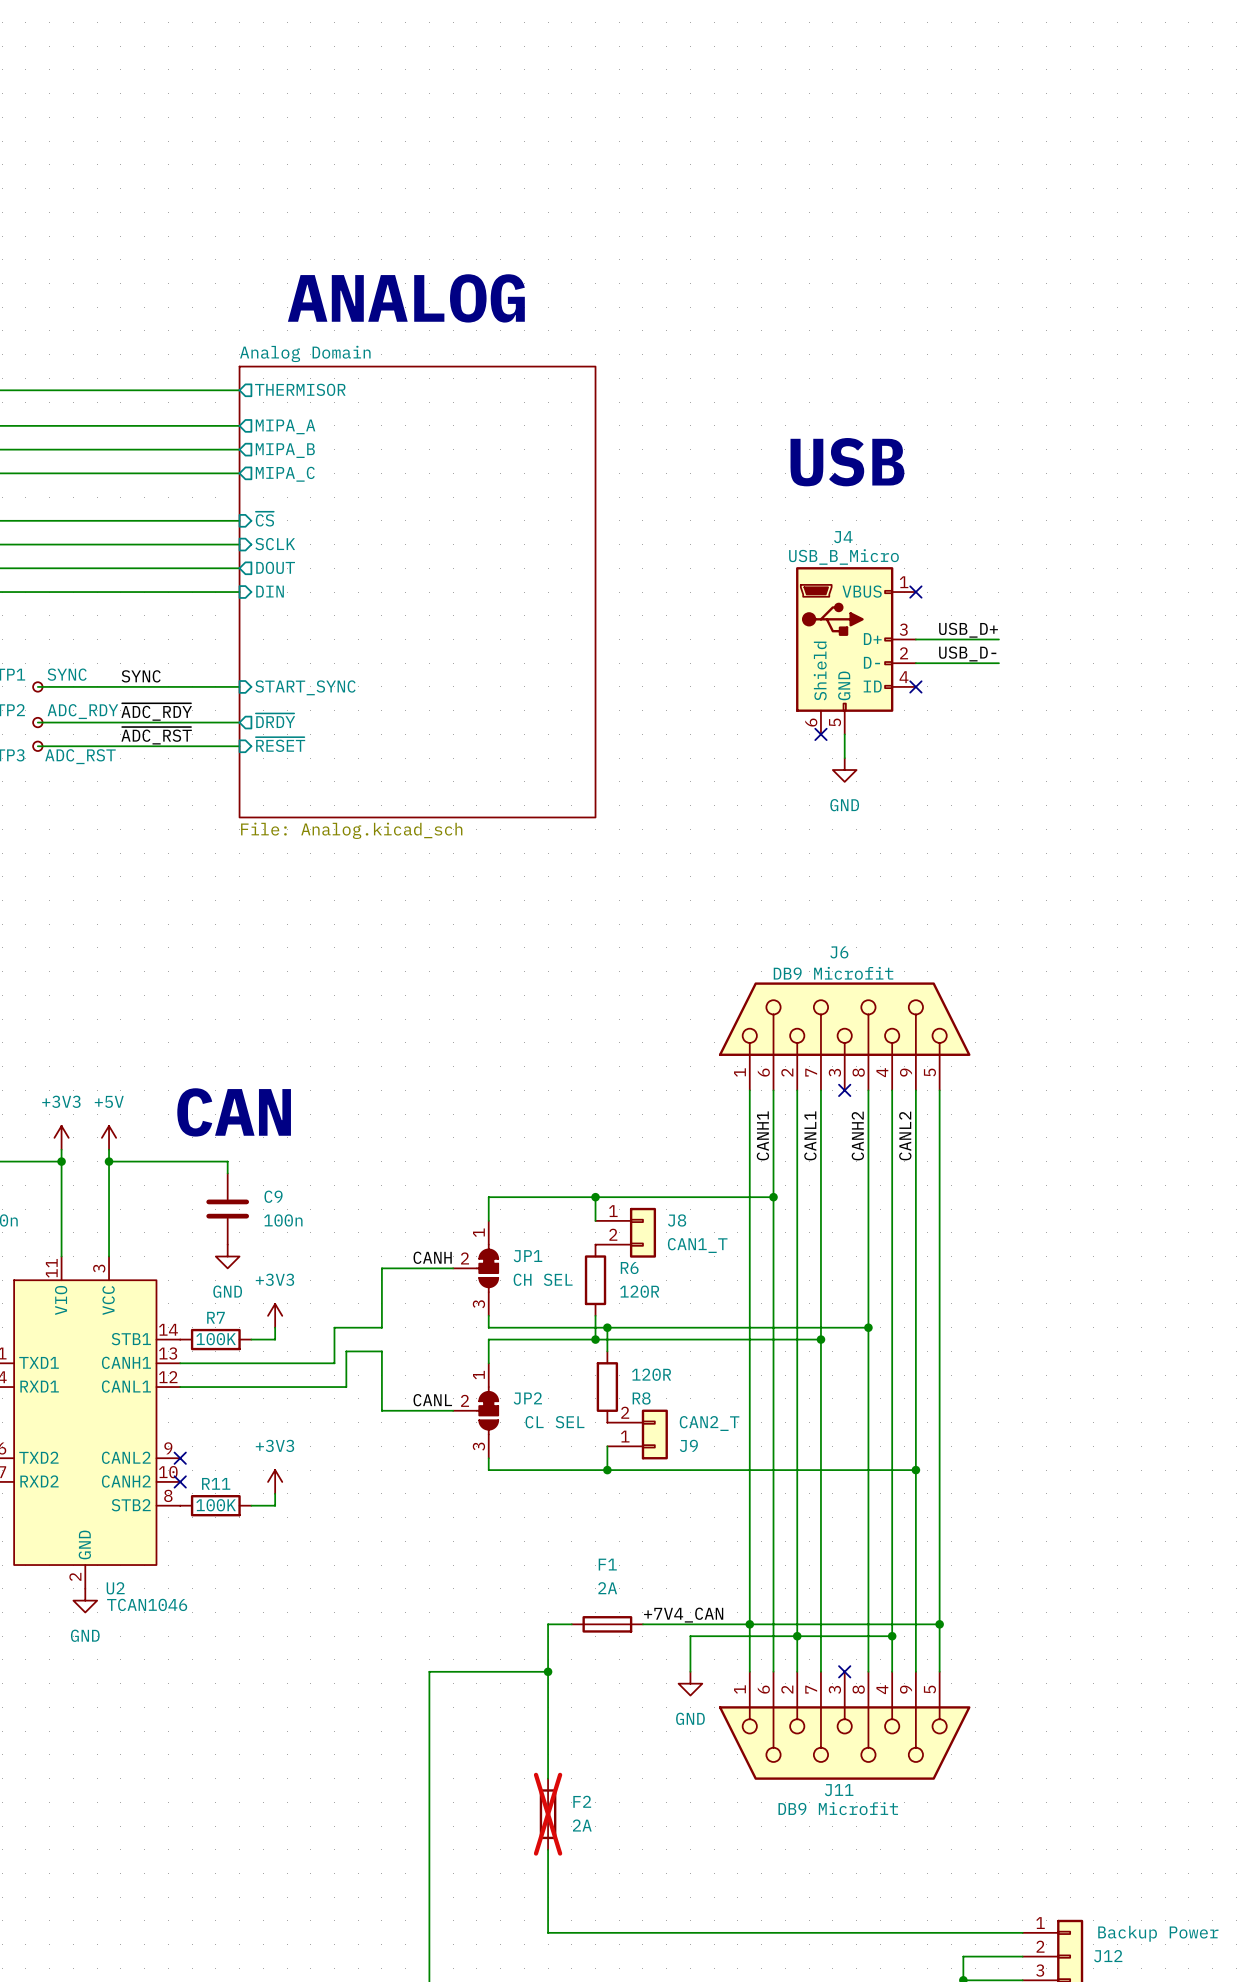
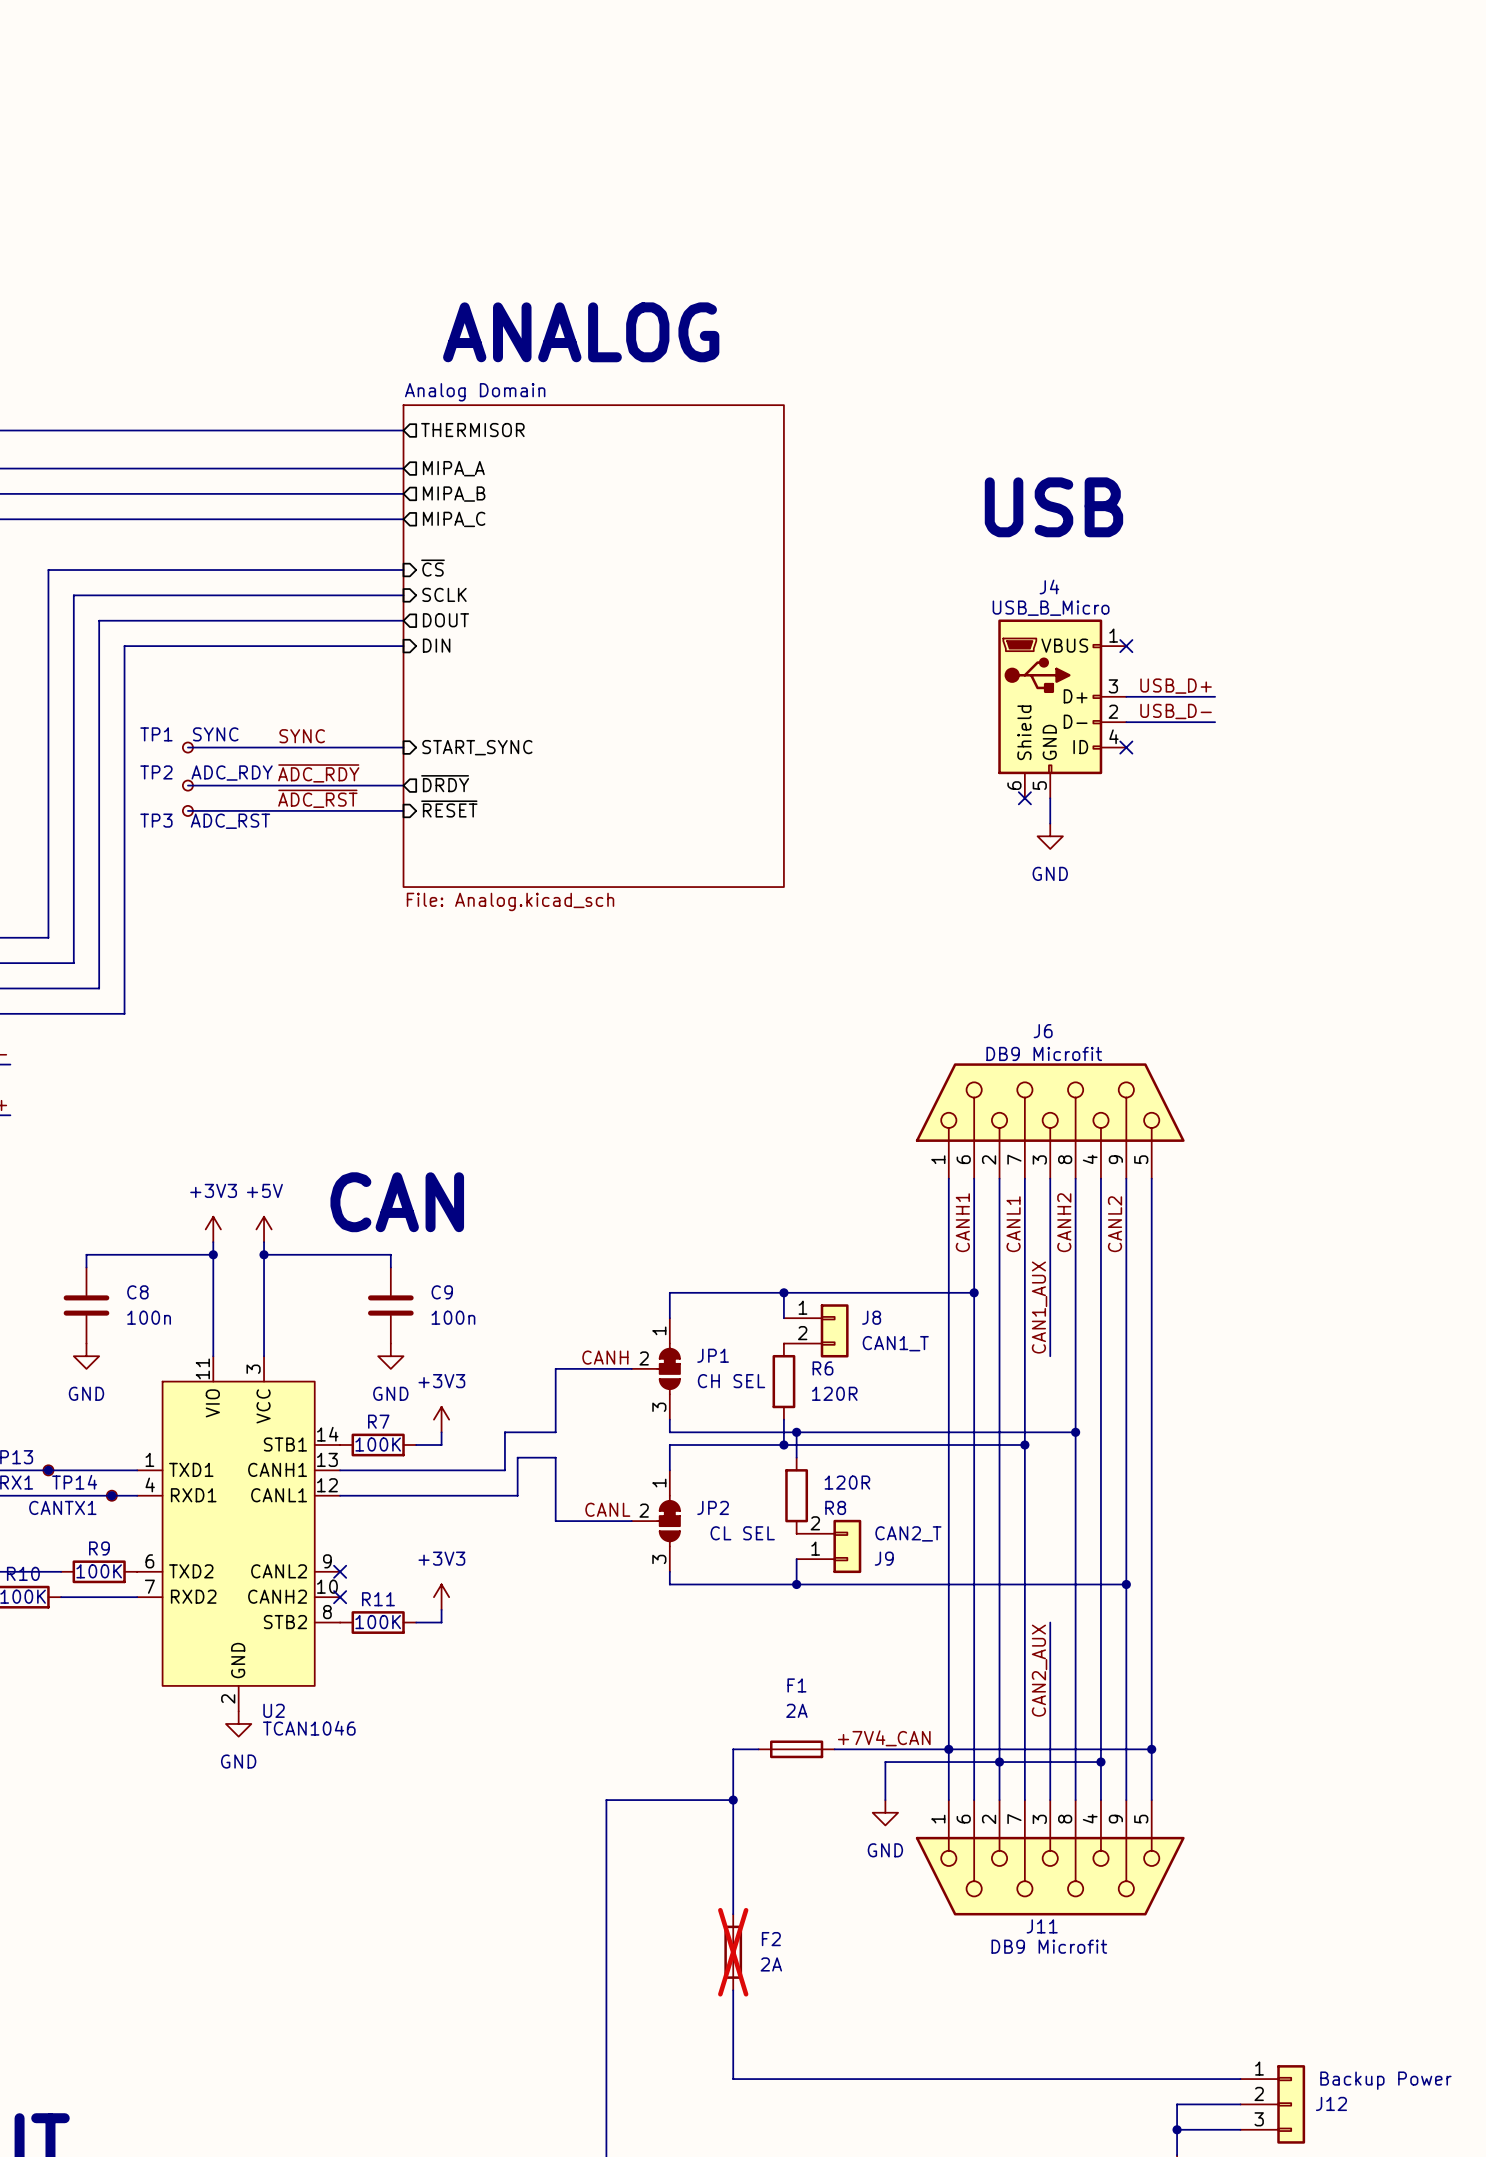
wire: none -> (1050, 1178) (1050, 1356)
no-connect mark: (844, 1090) -> none
label: none -> CAN1_AUX (1039, 1307)
wire: none -> (1050, 1622) (1050, 1800)
label: none -> CAN2_AUX (1039, 1670)
no-connect mark: (844, 1671) -> none

